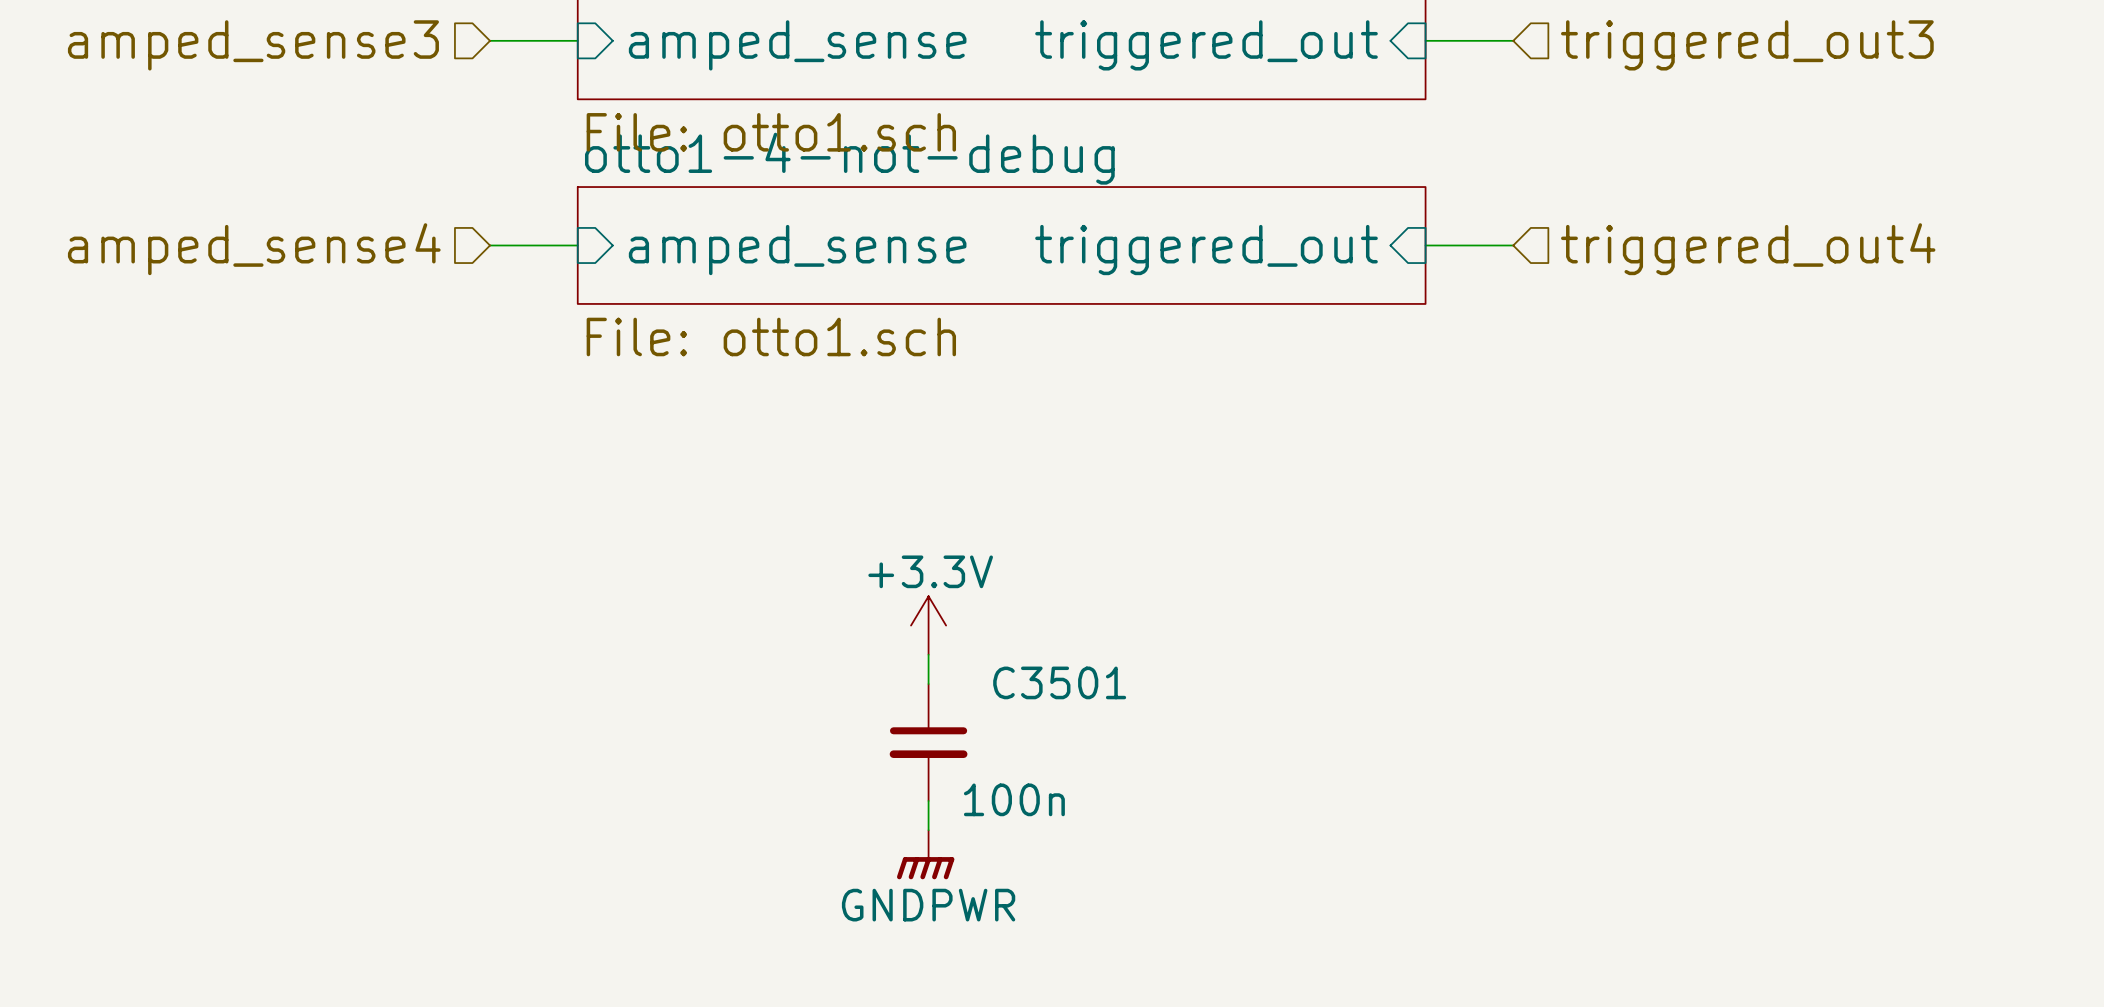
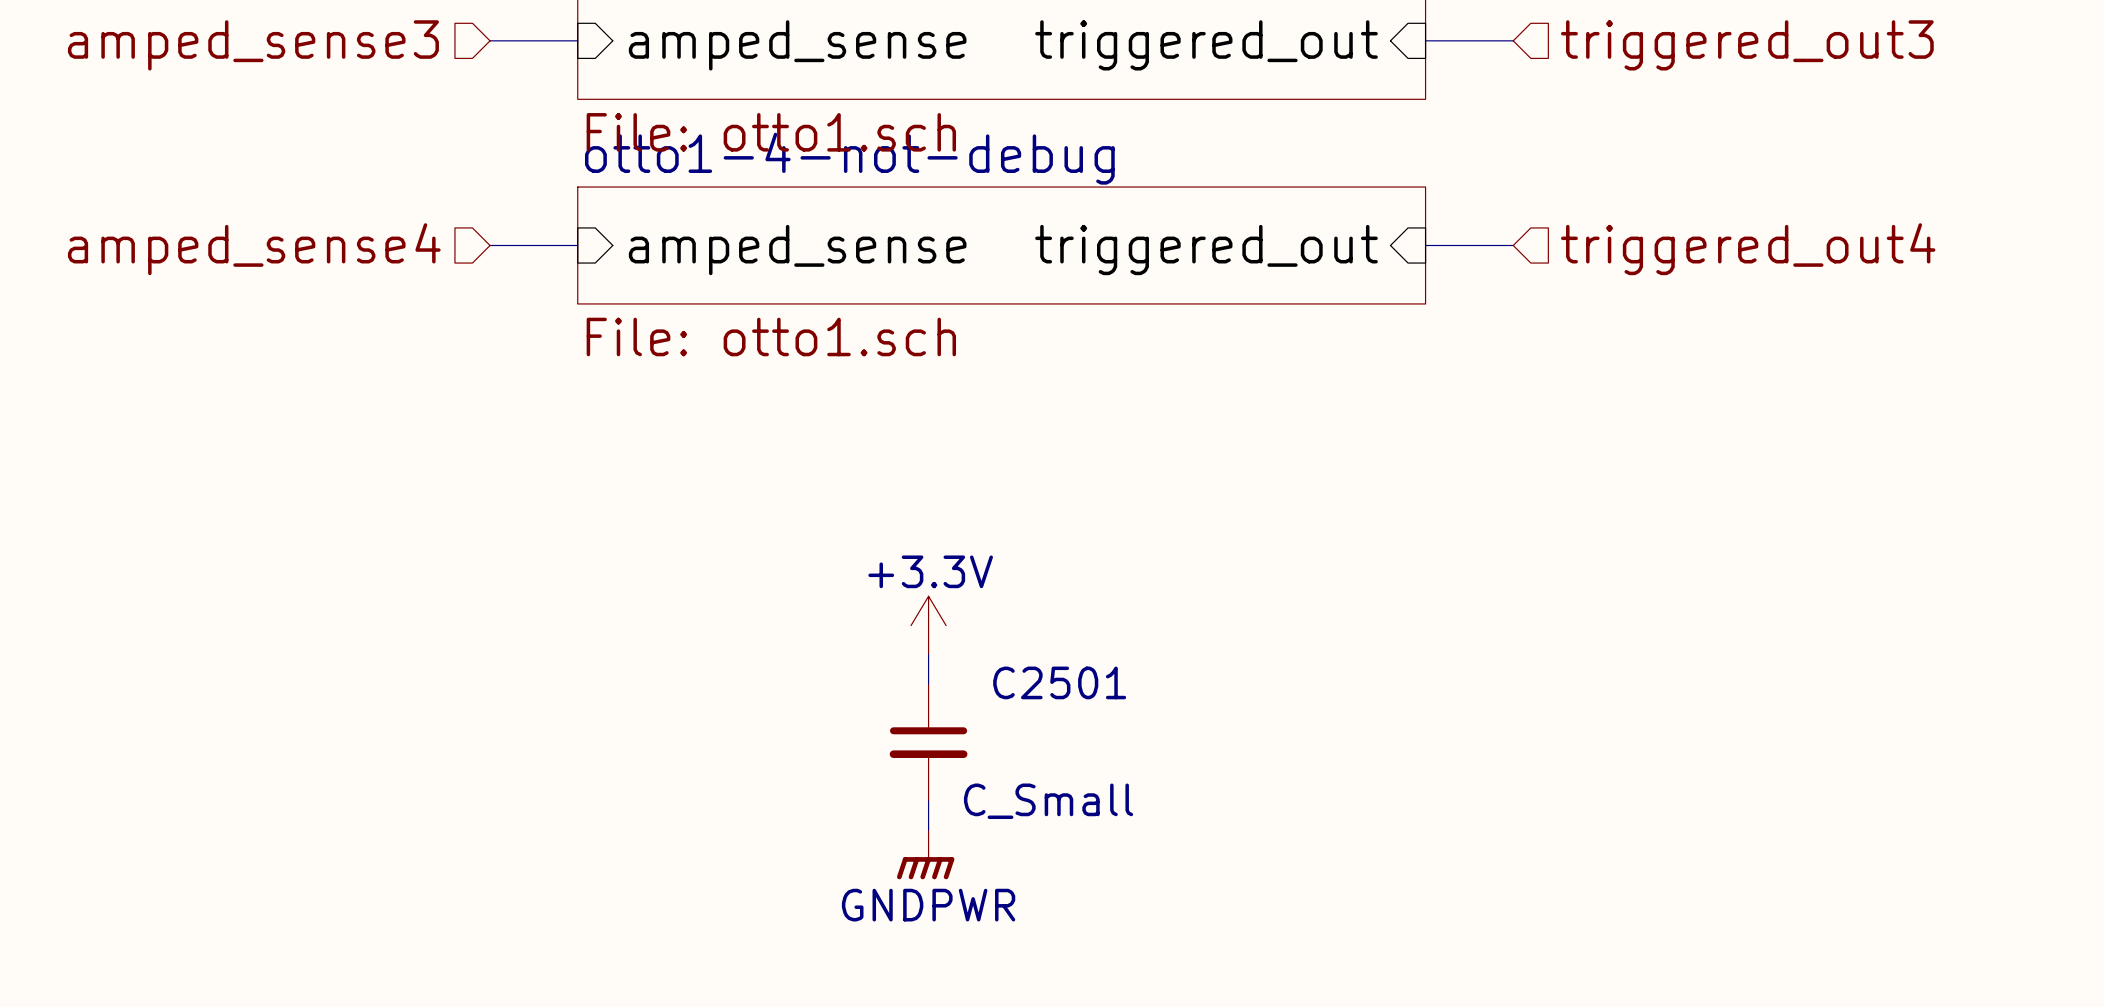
C3501 name: C3501 (1059, 682) -> C2501 (1059, 682)
C3501 value: 100n (1014, 799) -> C_Small (1048, 801)

